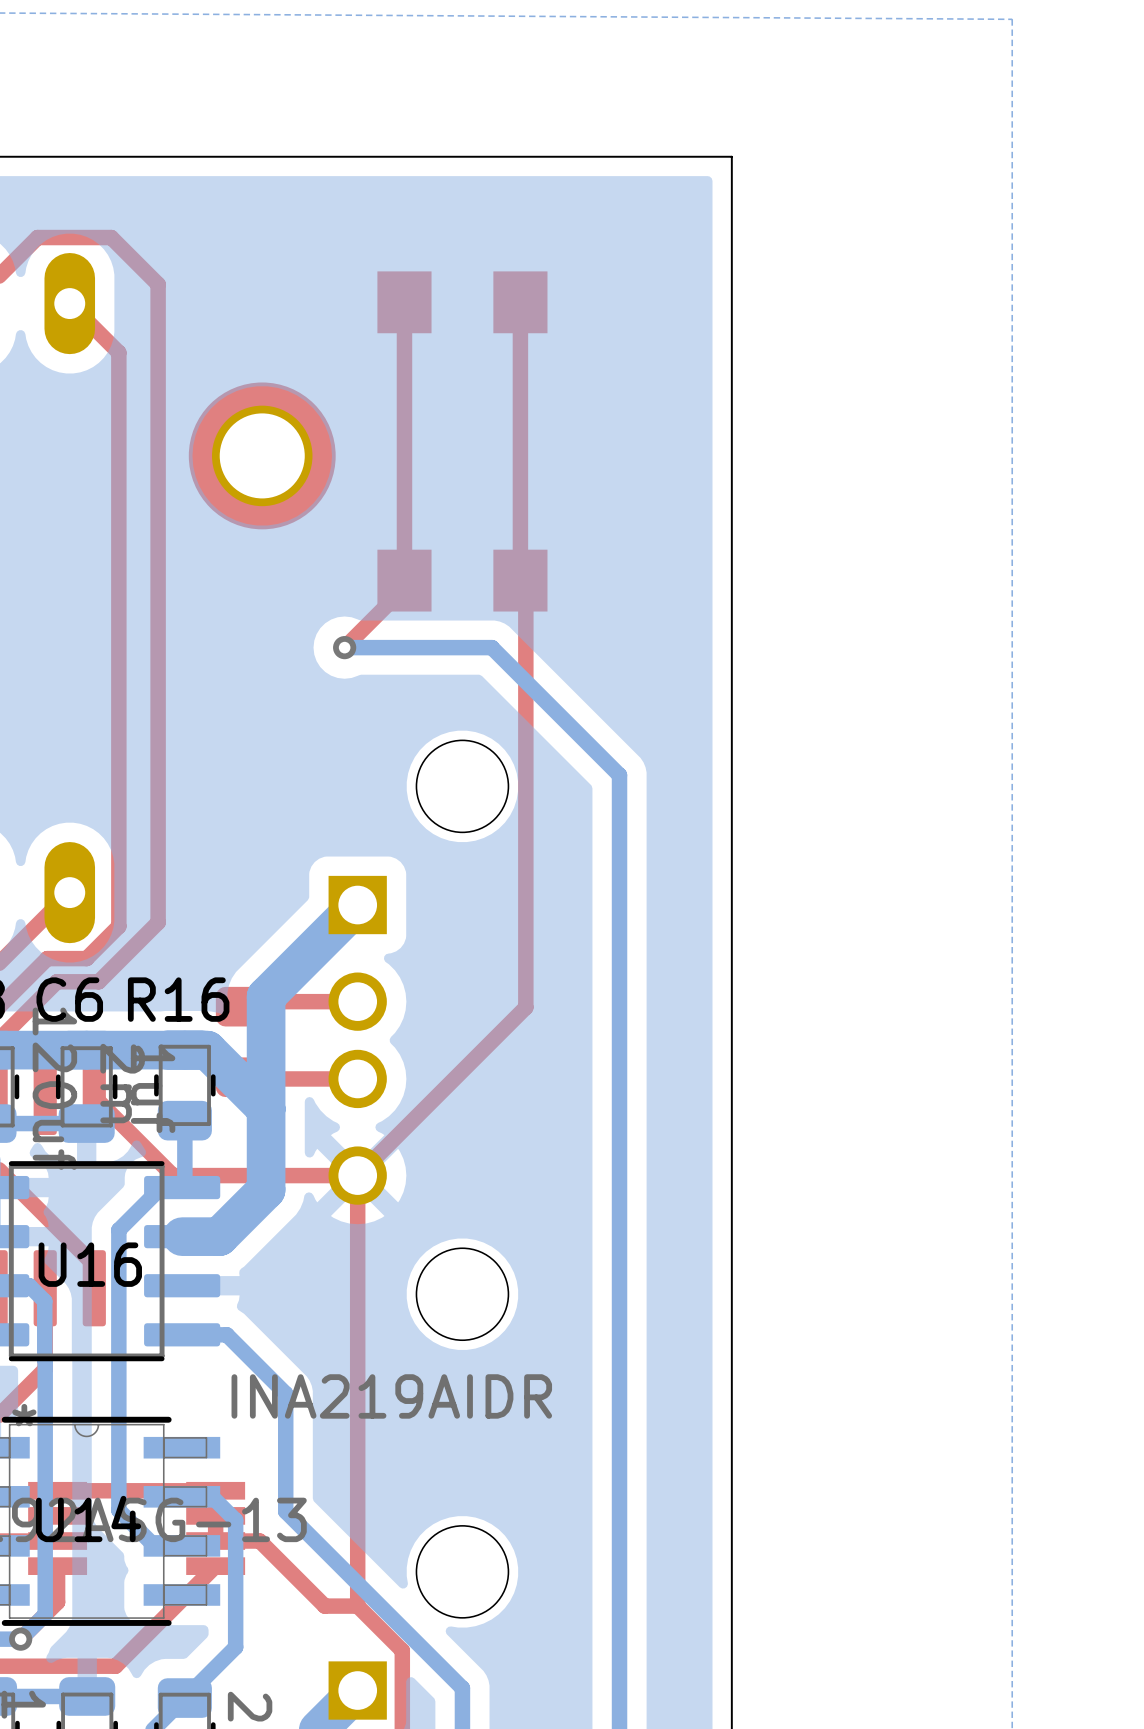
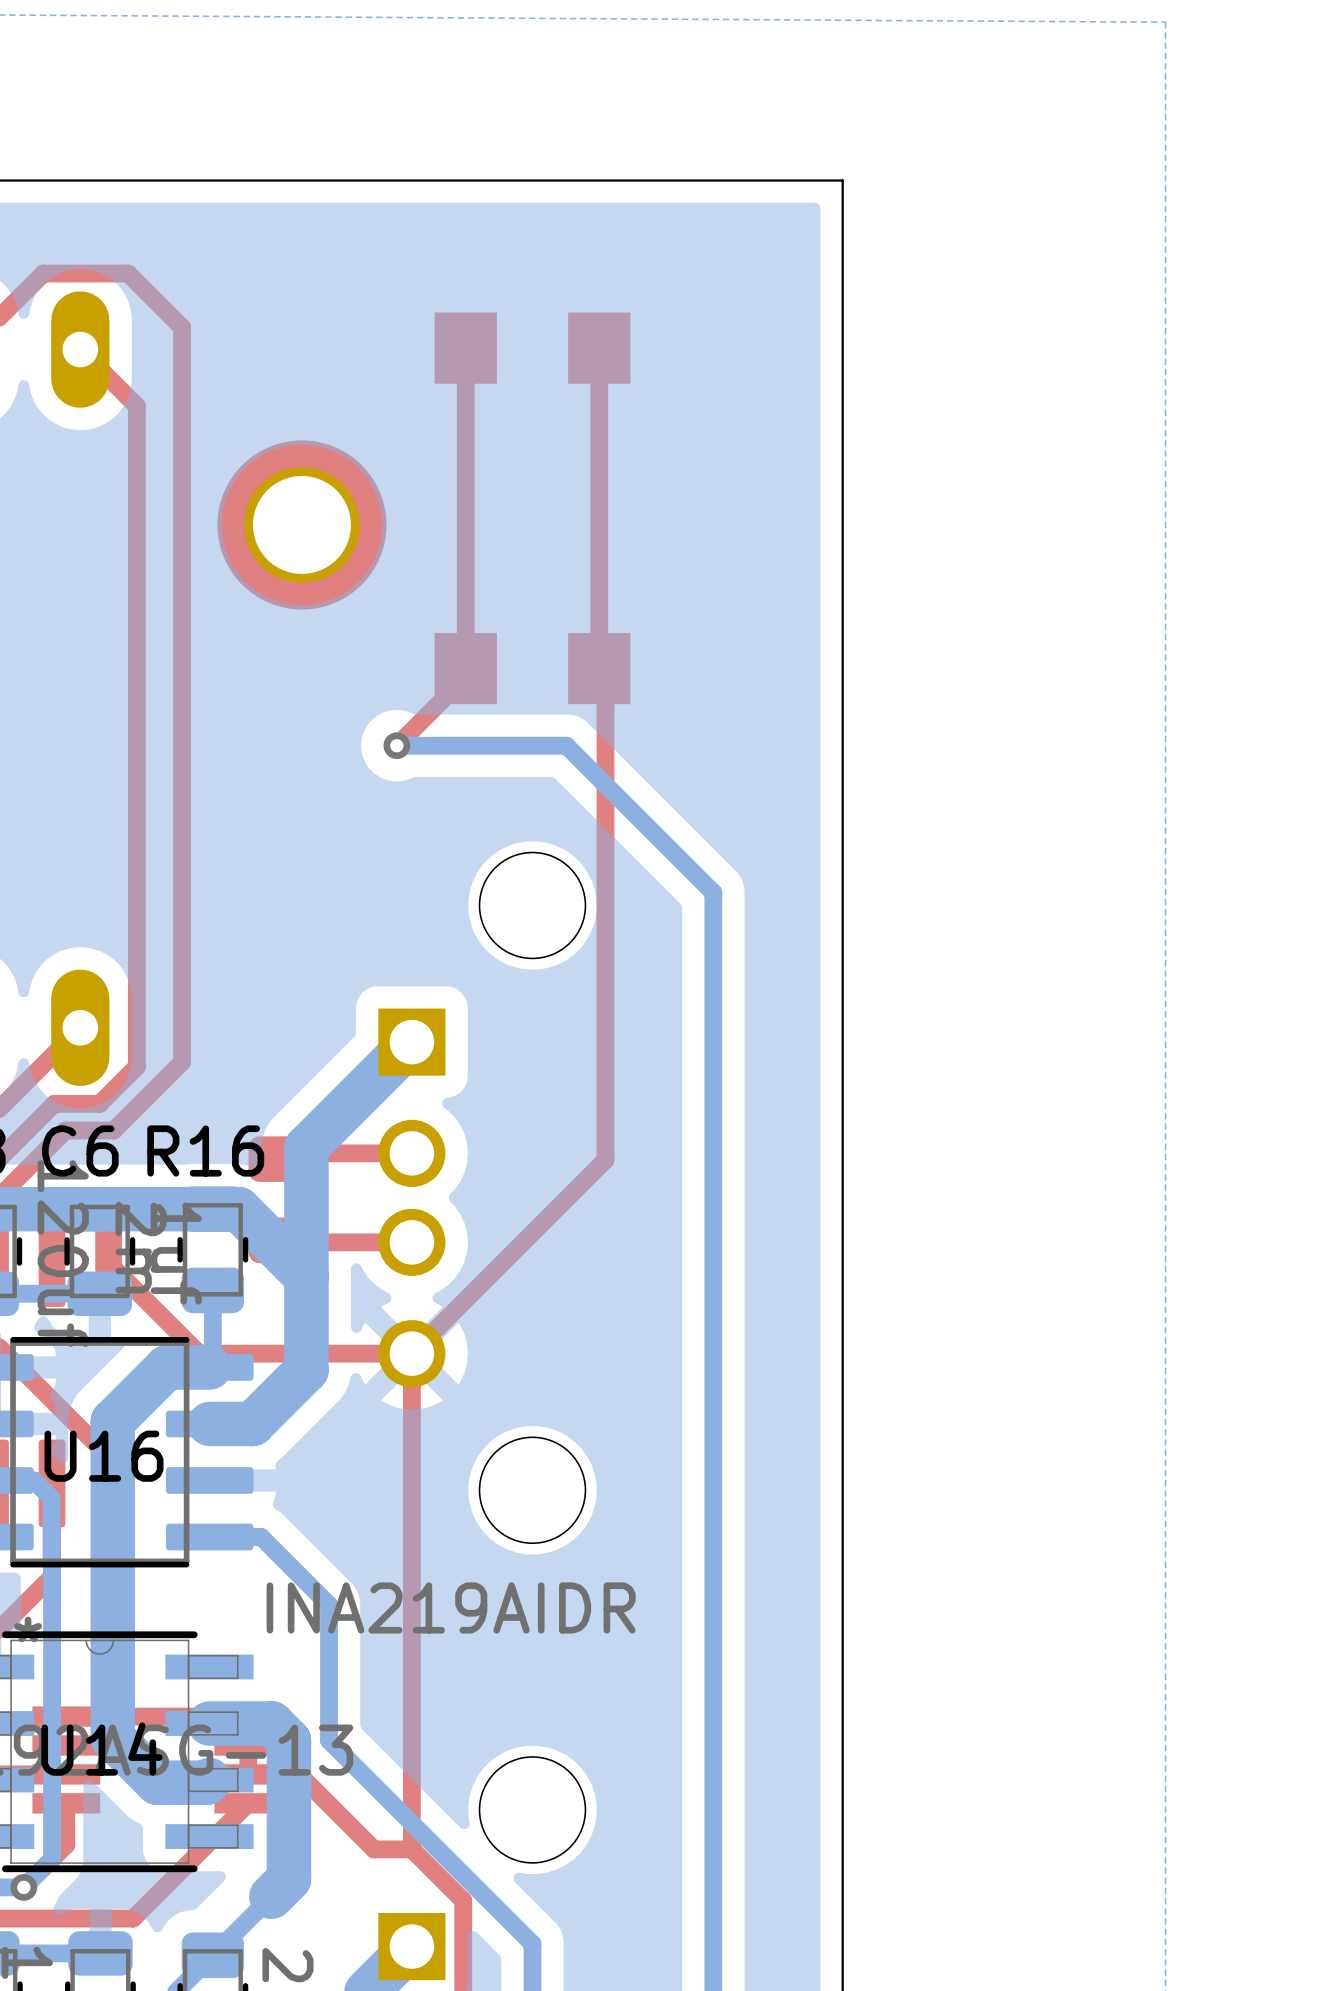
bottom track: (161, 1187) (118, 1230) (118, 1510) (154, 1545) (181, 1545) -> (209, 1367) (166, 1367) (112, 1421) (112, 1738) (157, 1782) (206, 1782) (209, 1780)
bottom track: (212, 1496) (235, 1520) (235, 1647) -> (209, 1723) (271, 1723) (288, 1740) (288, 1879) (271, 1896)

